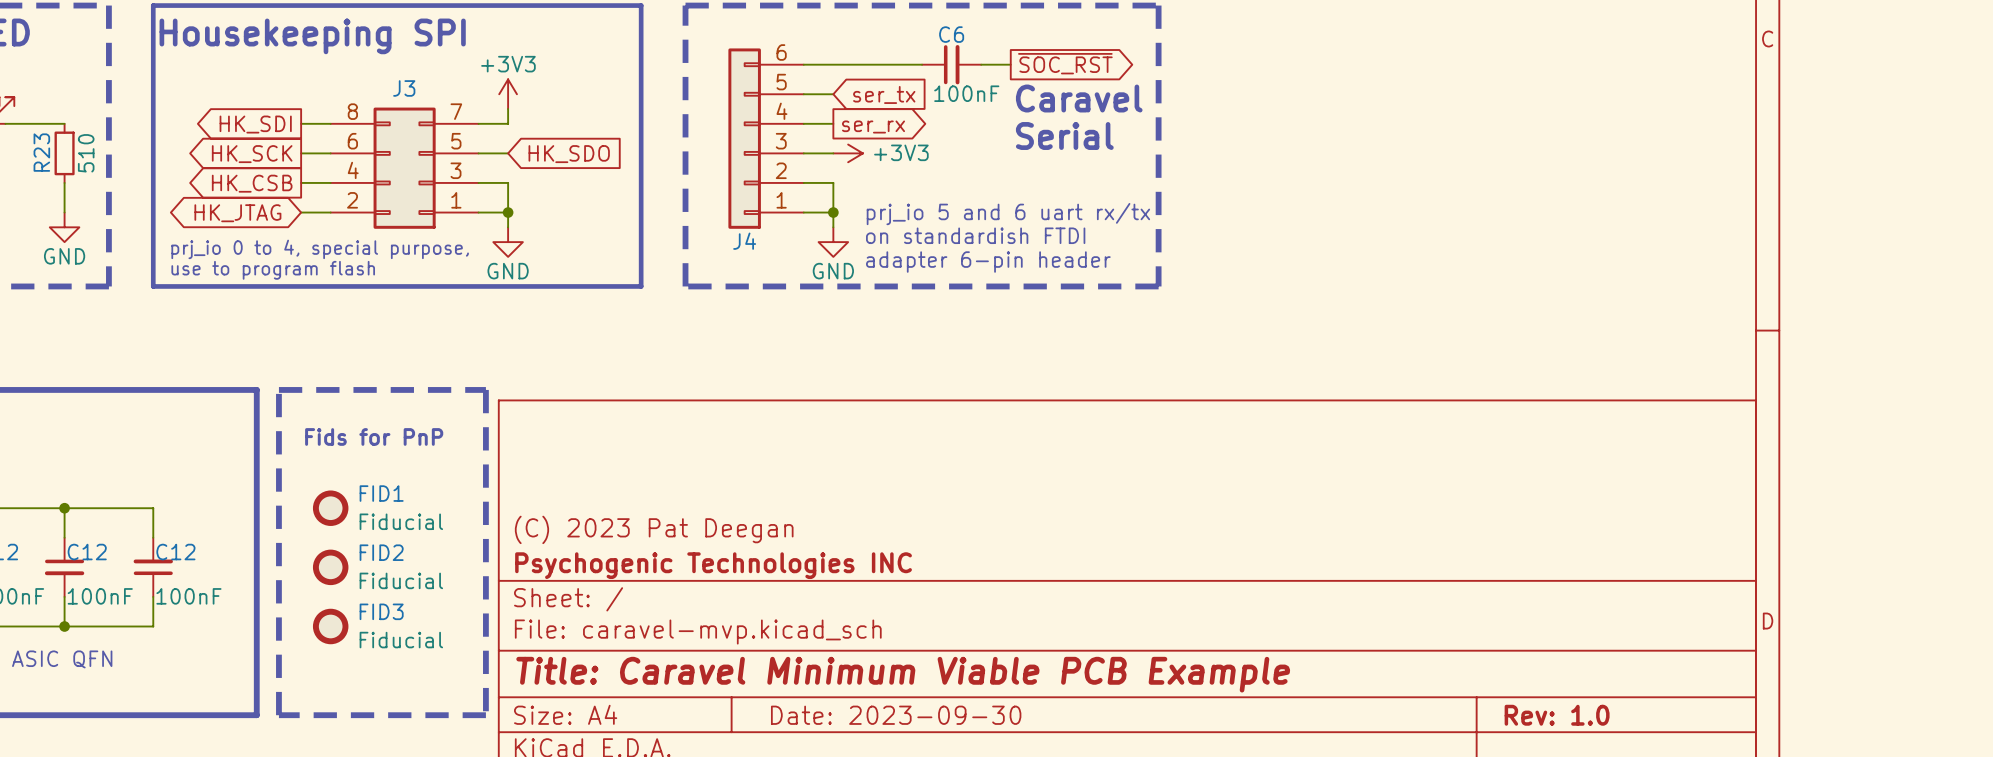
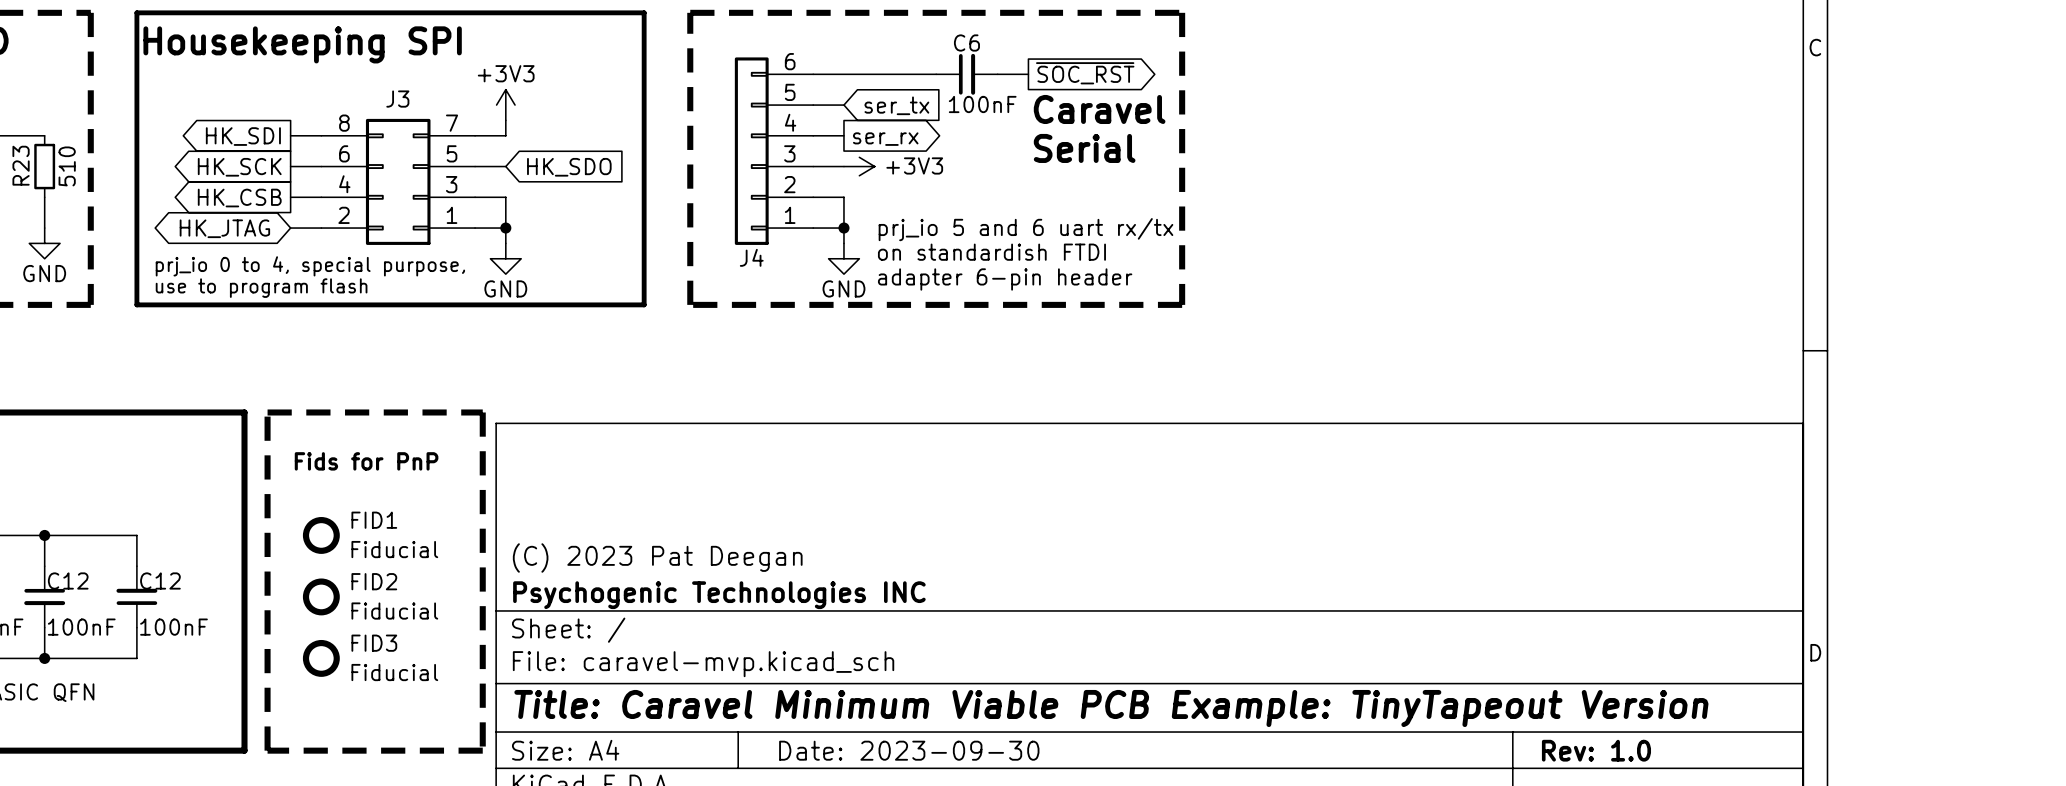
title block: Title: Caravel Minimum Viable PCB Example (903, 674) -> Title: Caravel Minimum Viable PCB Example: TinyTapeout Version (1111, 708)

